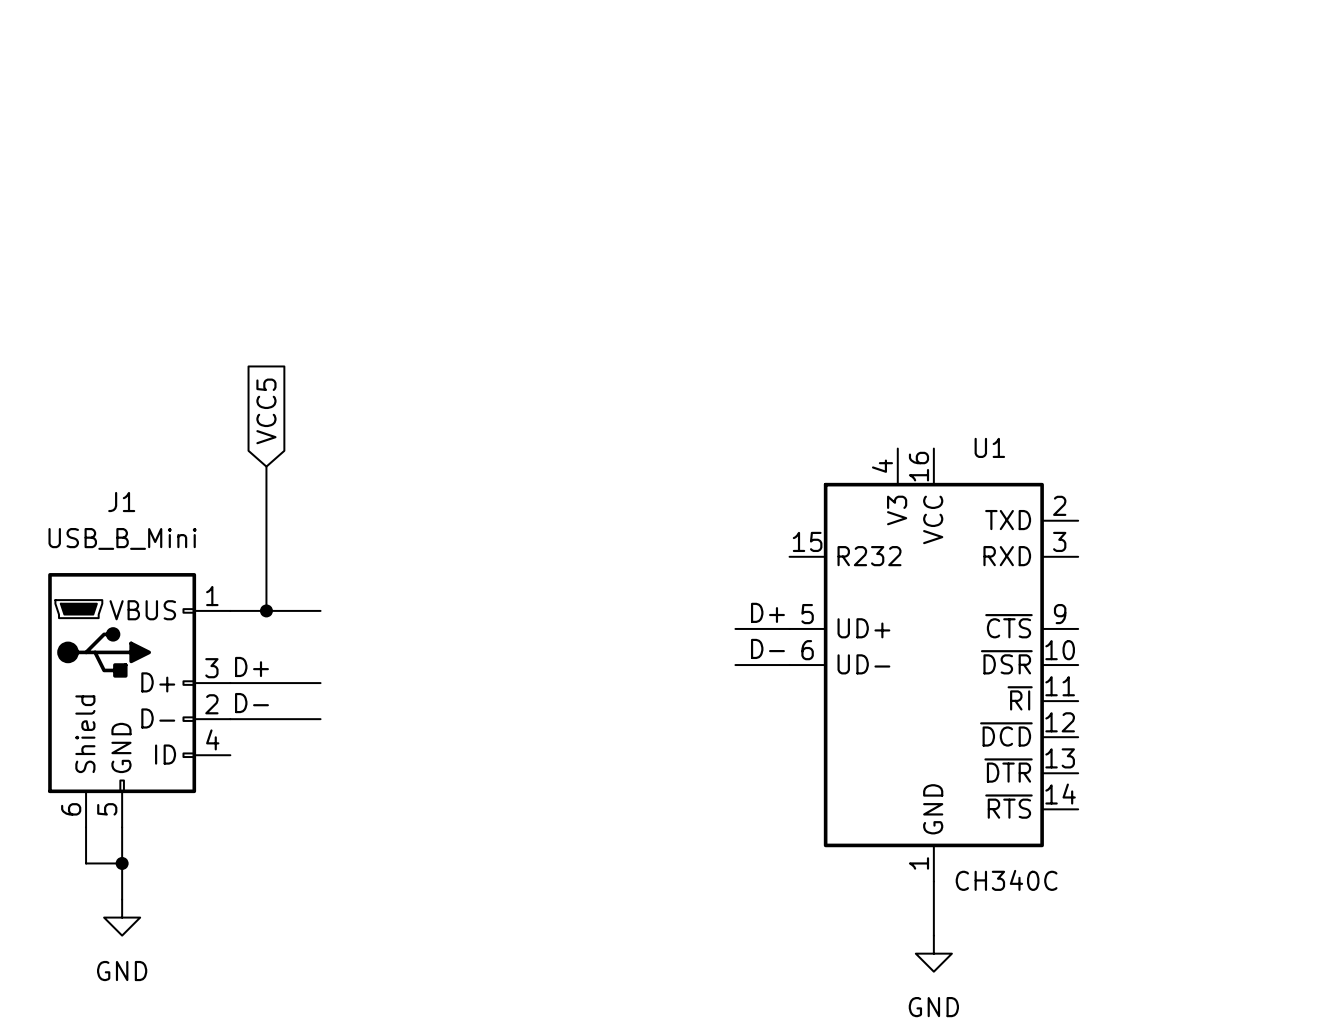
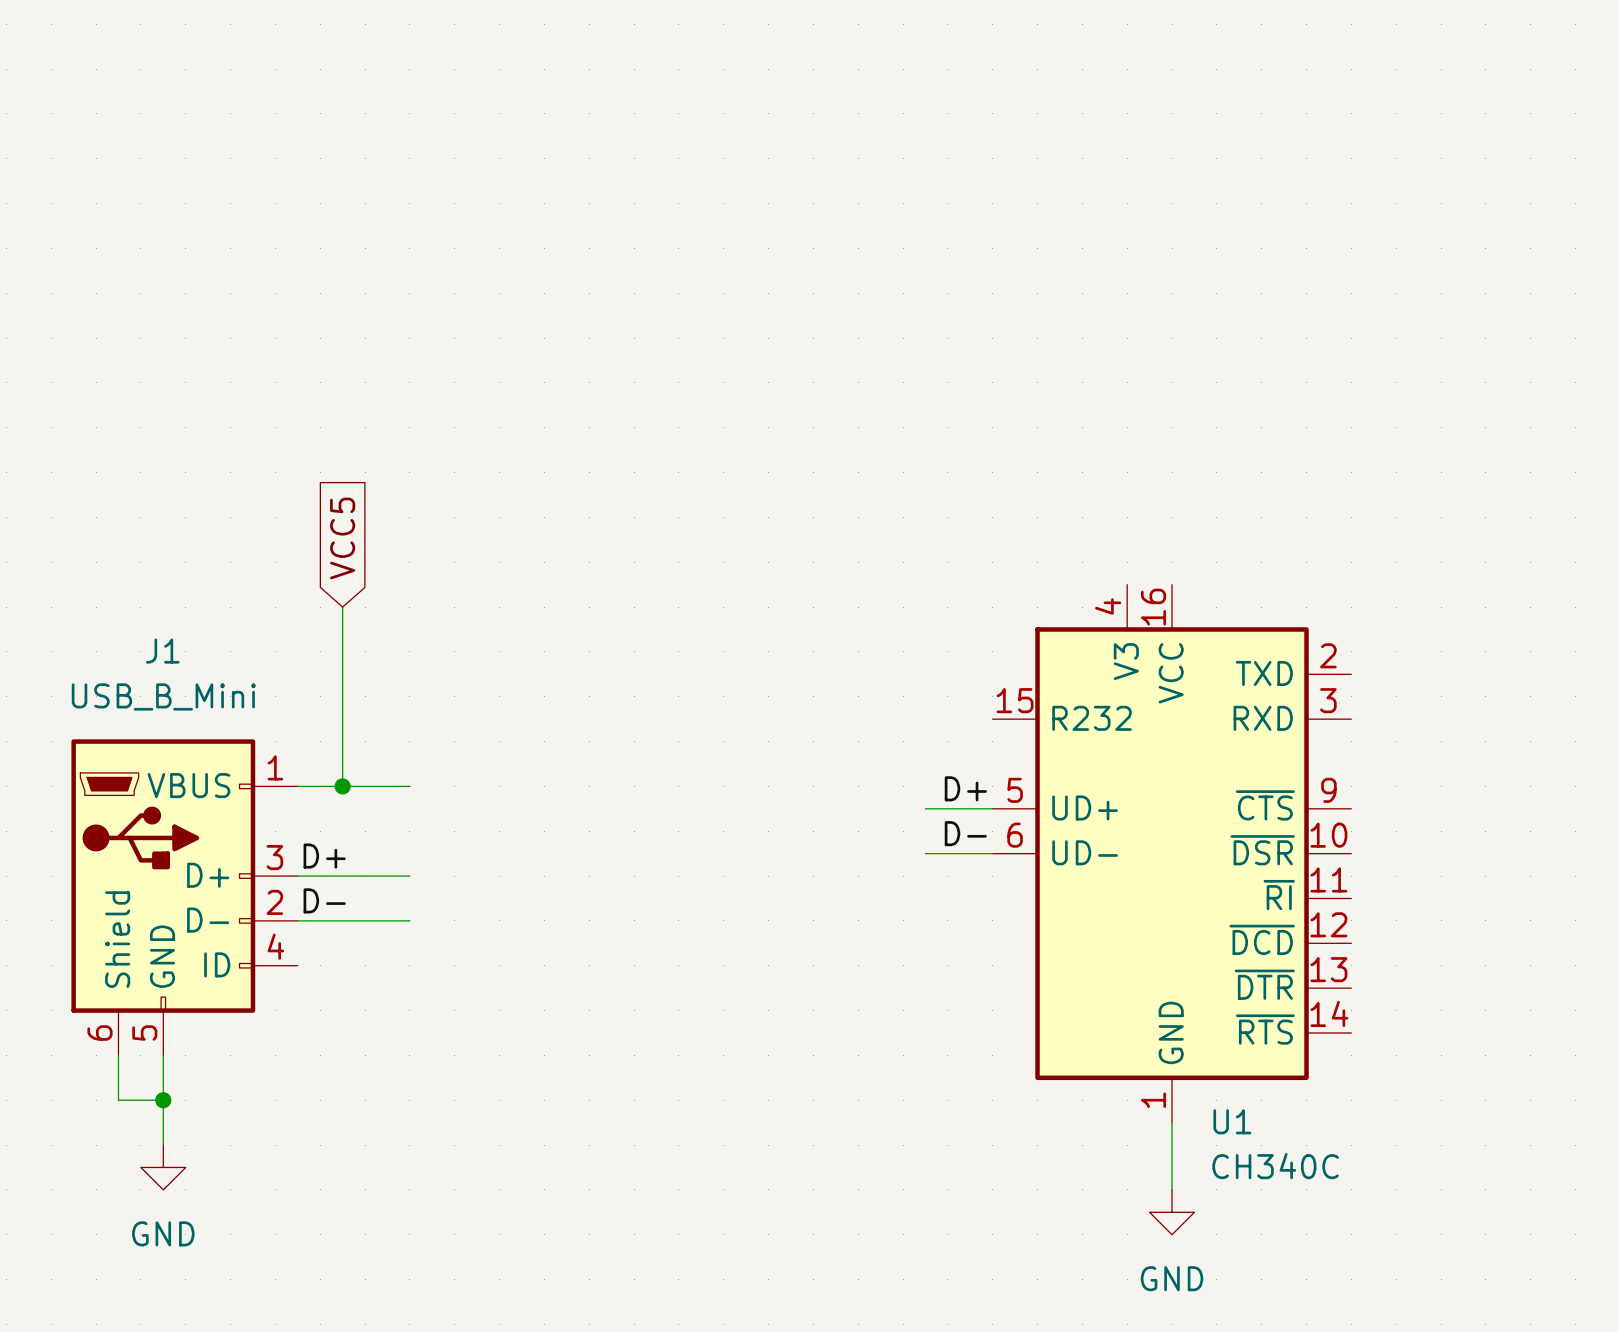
U1 name position: U1 (989, 447) -> U1 (1232, 1121)
U1 value position: CH340C (1006, 880) -> CH340C (1275, 1166)

